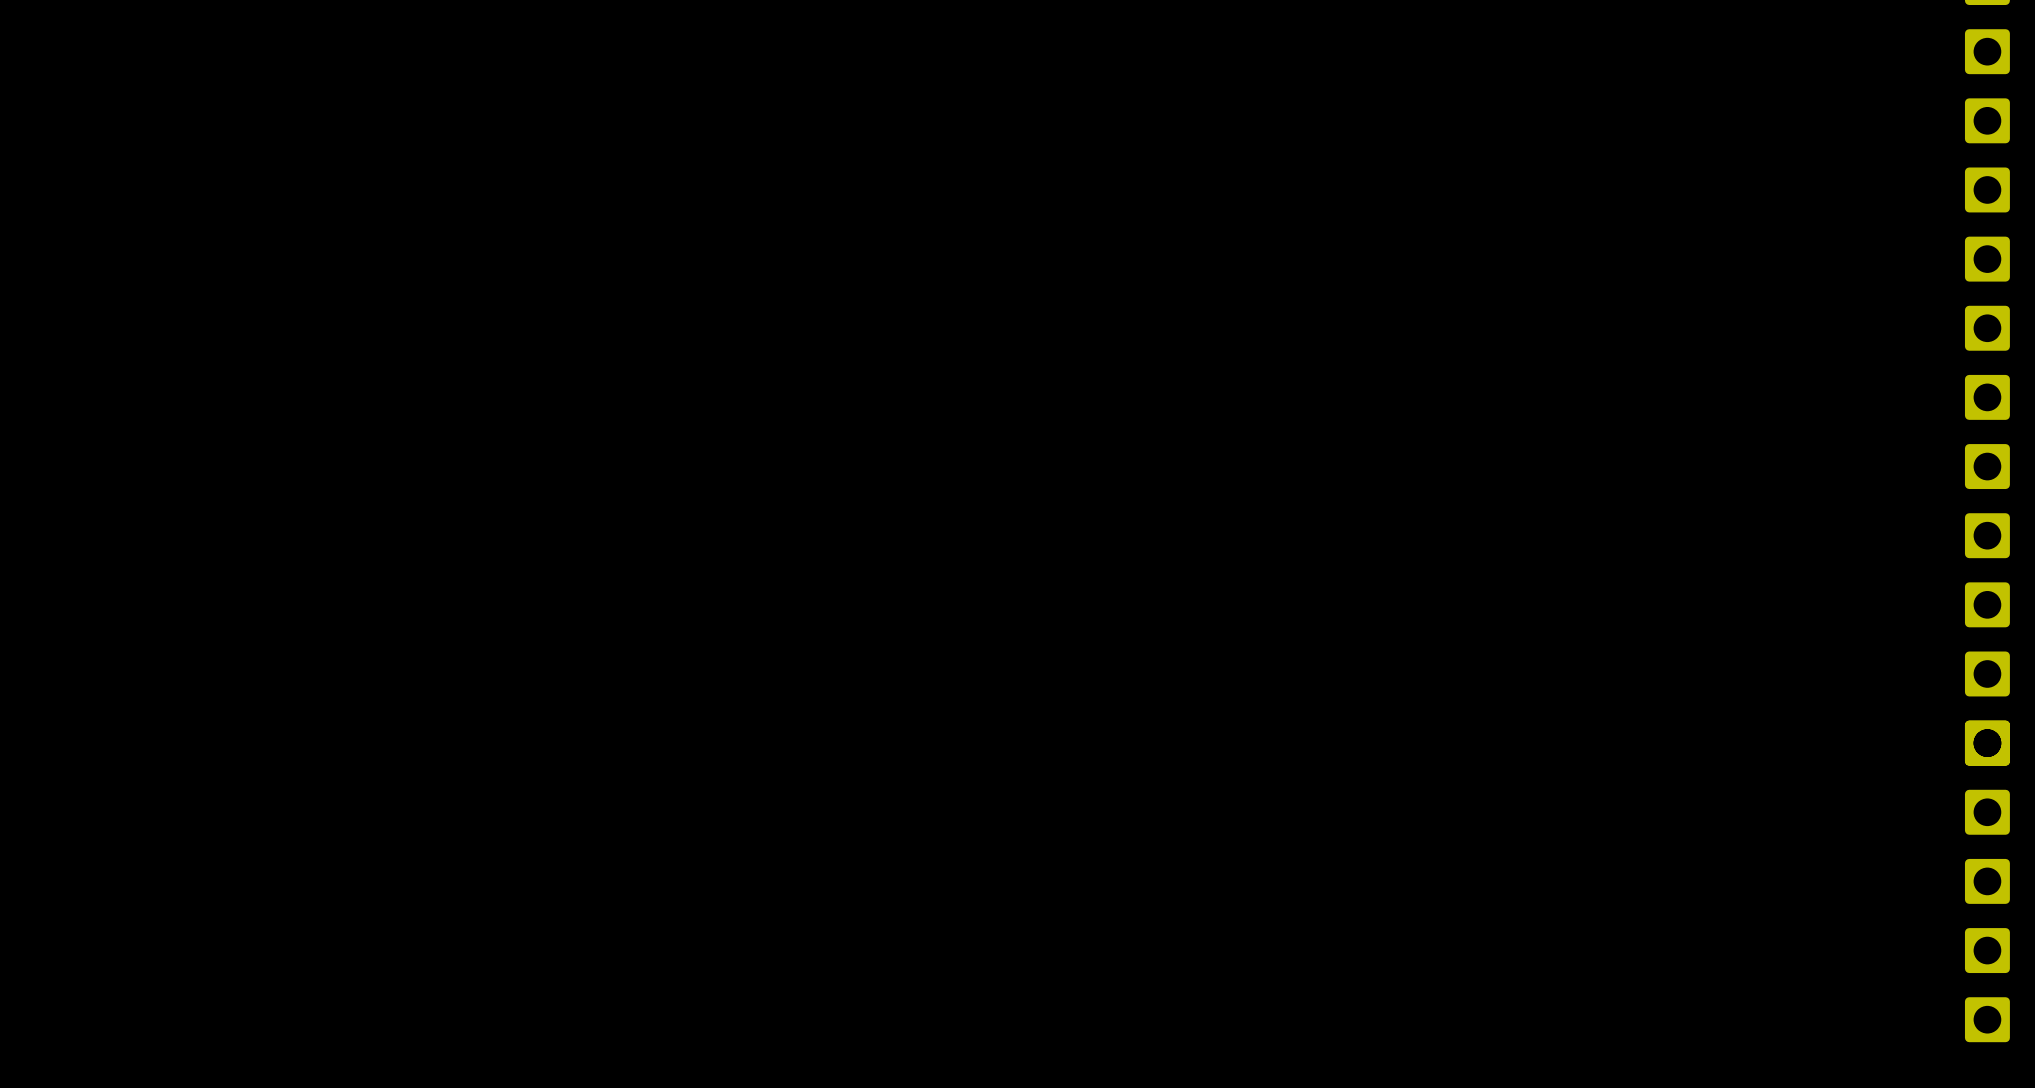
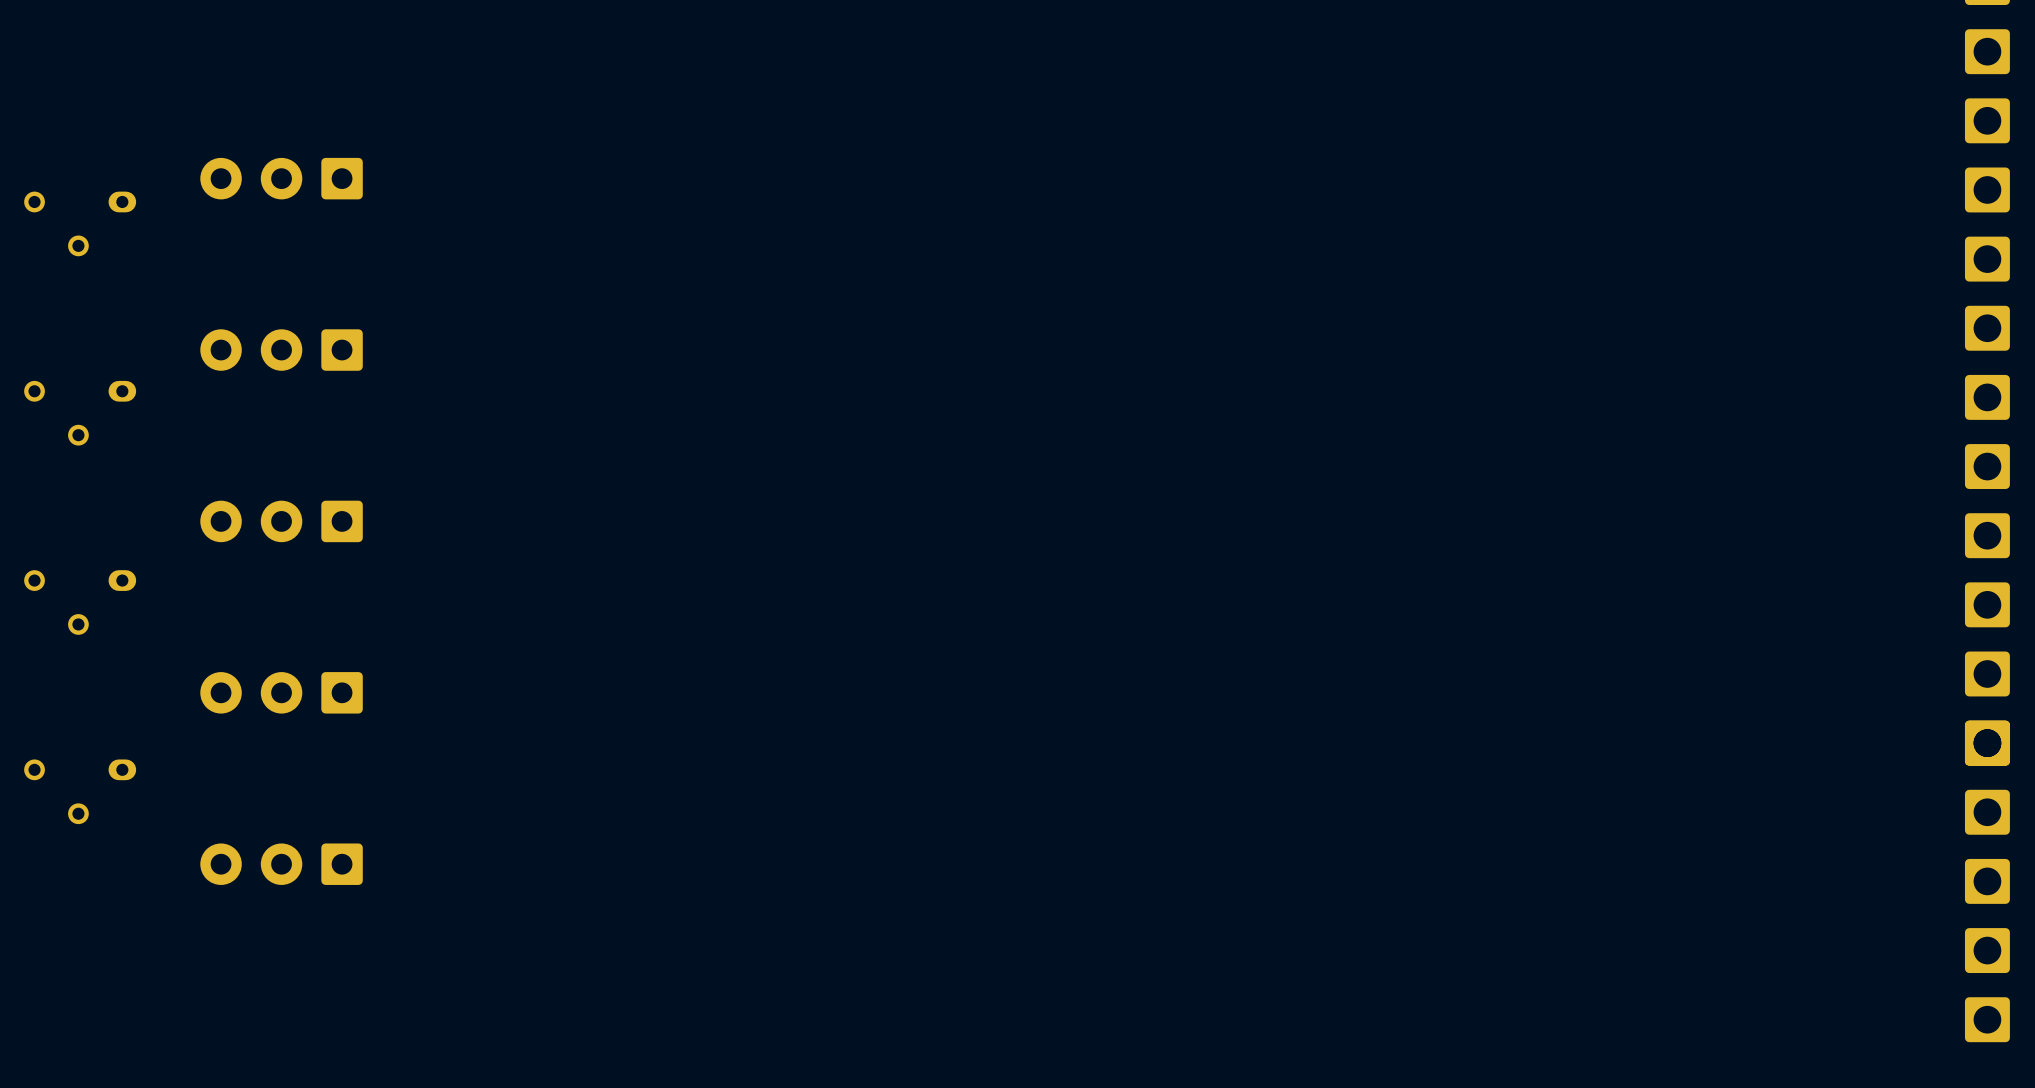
part: none -> (281, 178)
part: none -> (80, 223)
part: none -> (281, 350)
part: none -> (80, 413)
part: none -> (281, 521)
part: none -> (80, 602)
part: none -> (281, 692)
part: none -> (80, 791)
part: none -> (281, 864)

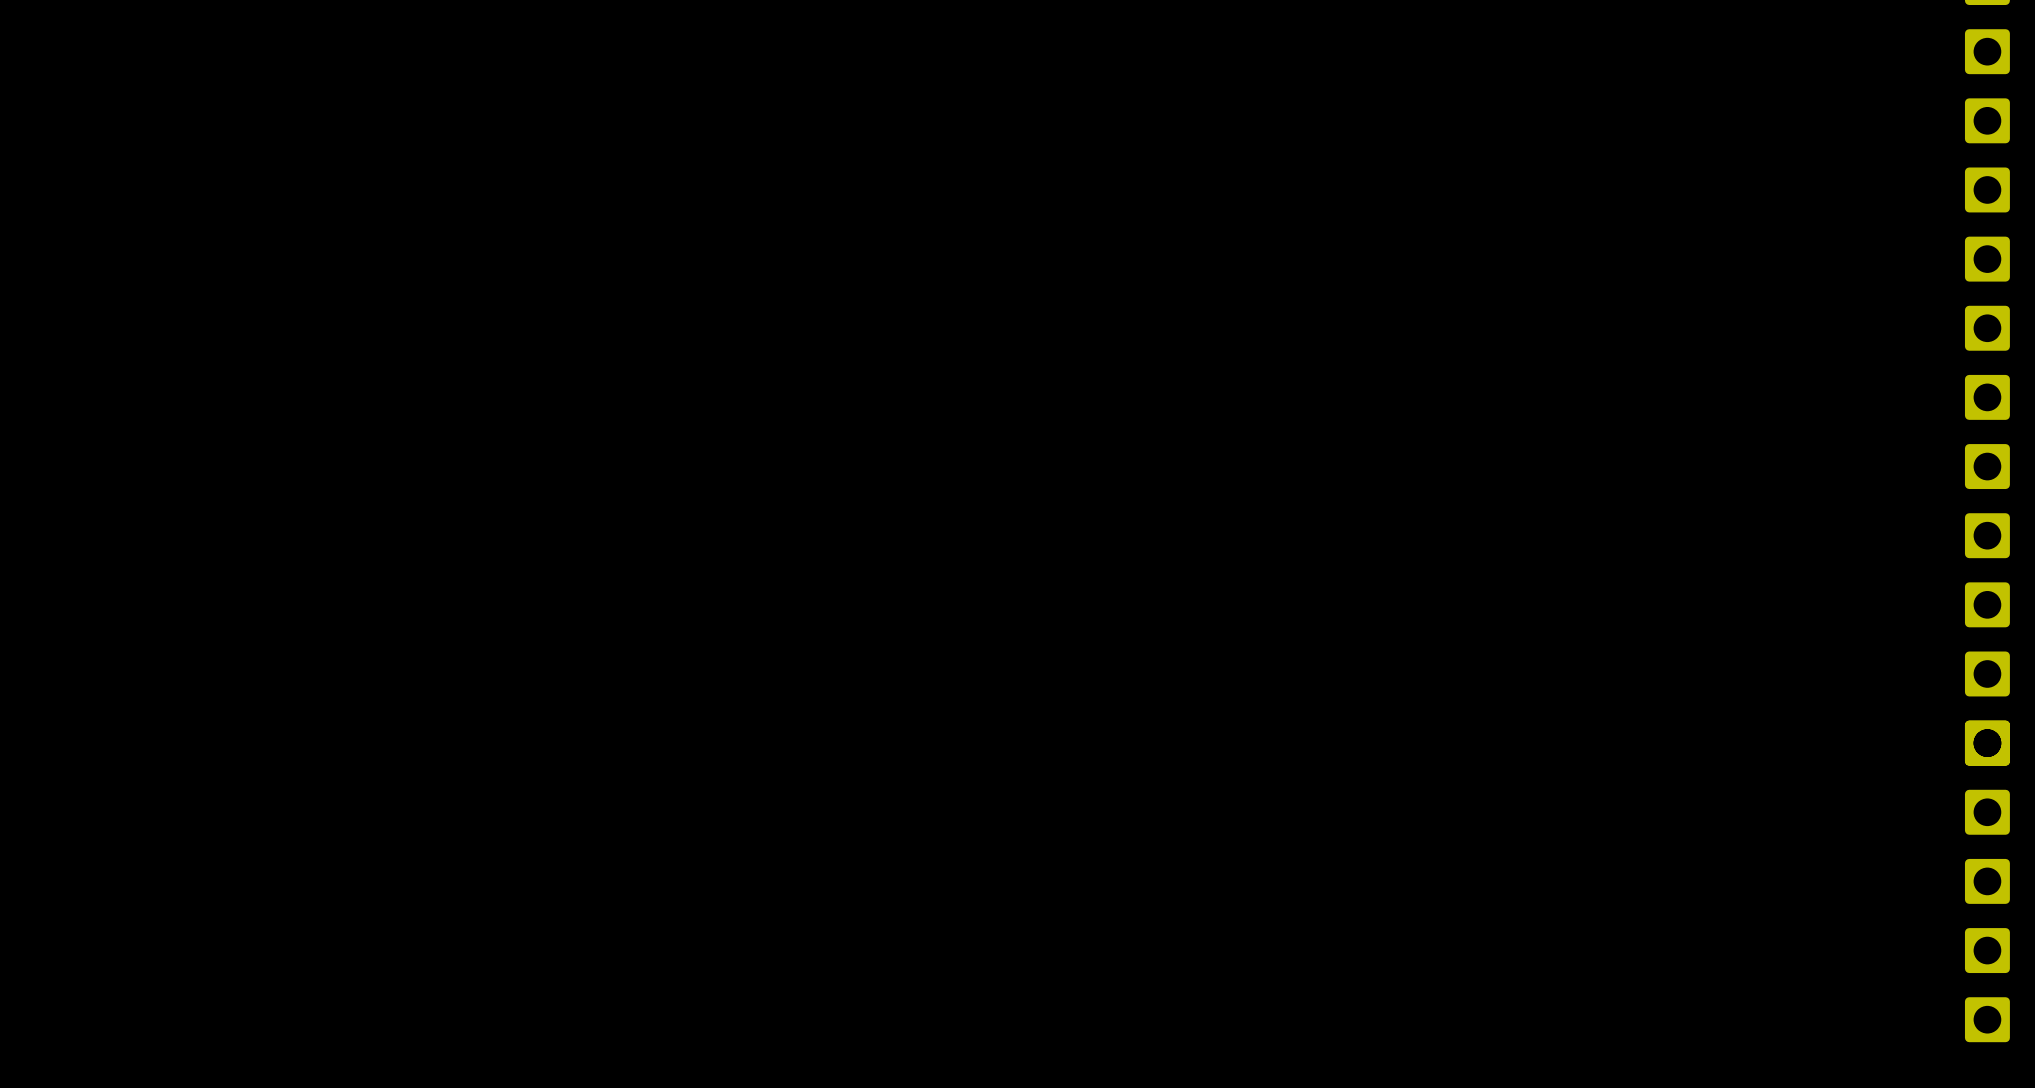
part: (281, 178) -> none
part: (80, 223) -> none
part: (281, 350) -> none
part: (80, 413) -> none
part: (281, 521) -> none
part: (80, 602) -> none
part: (281, 692) -> none
part: (80, 791) -> none
part: (281, 864) -> none

